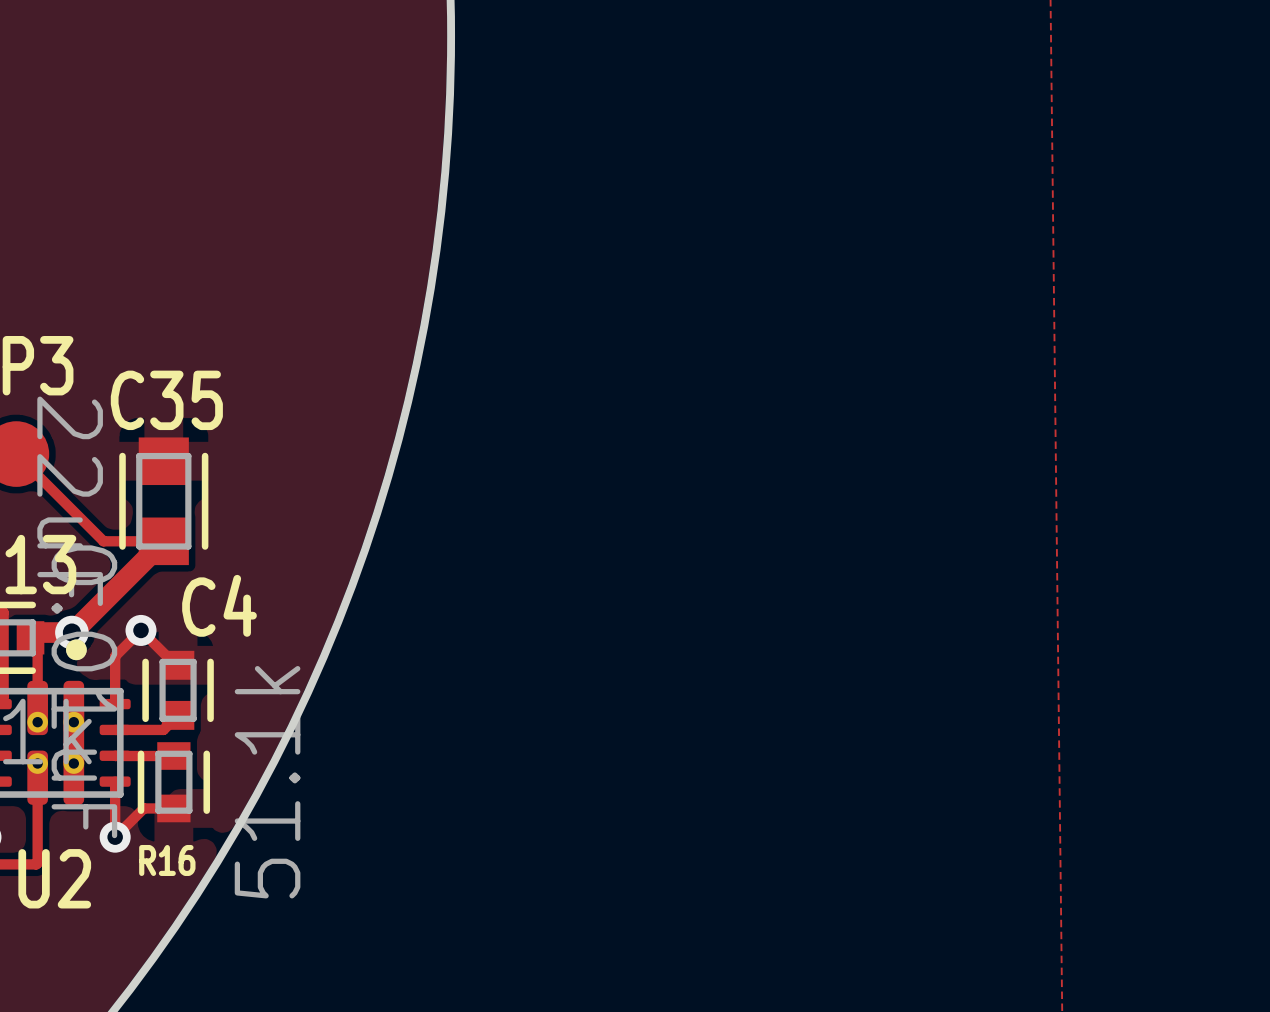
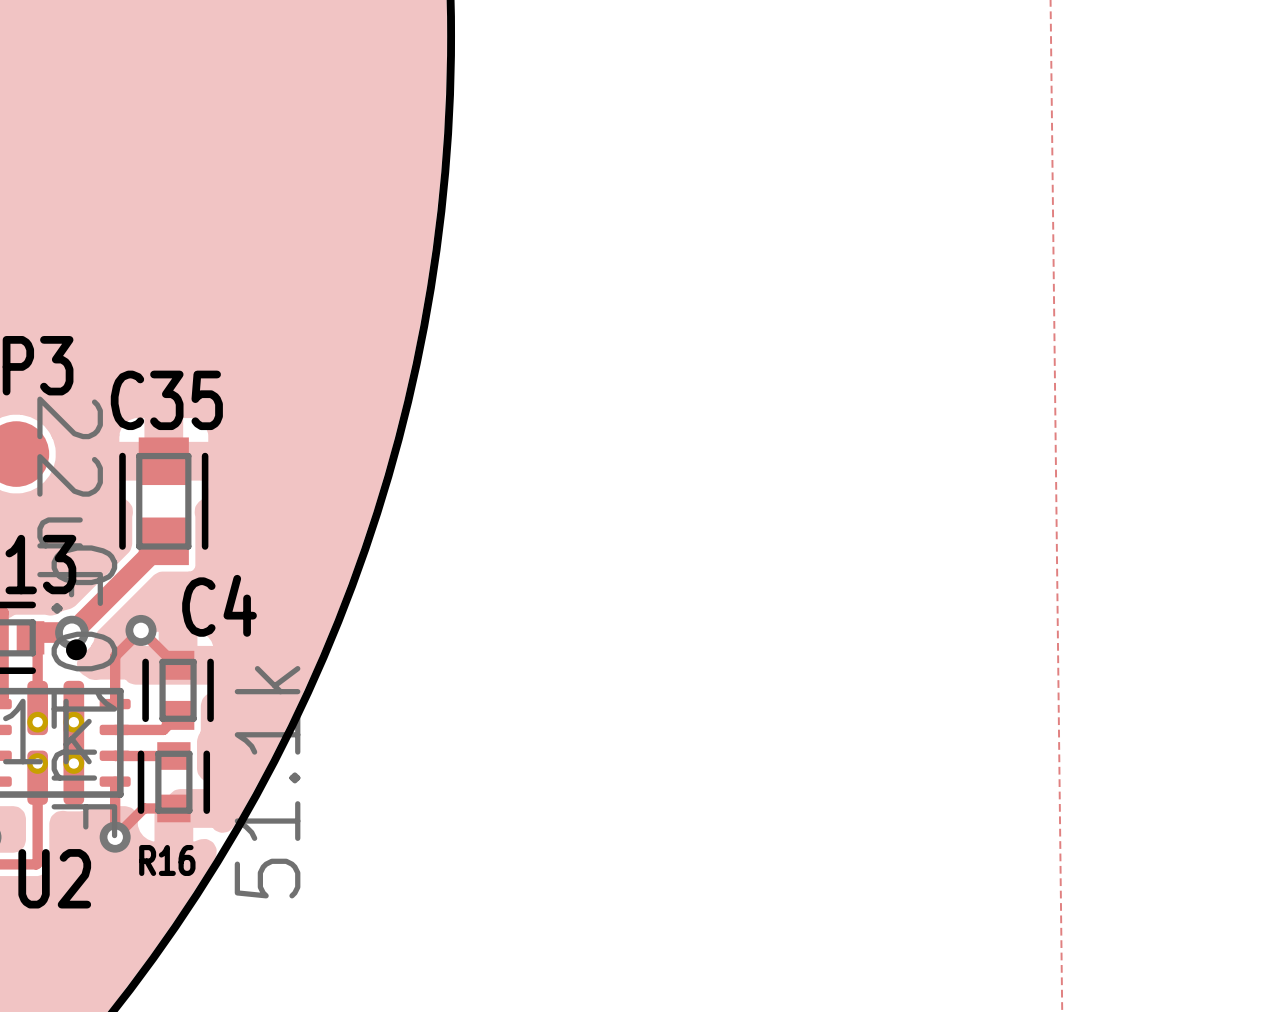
track: (16, 454) (103, 541) (163, 541) -> none

